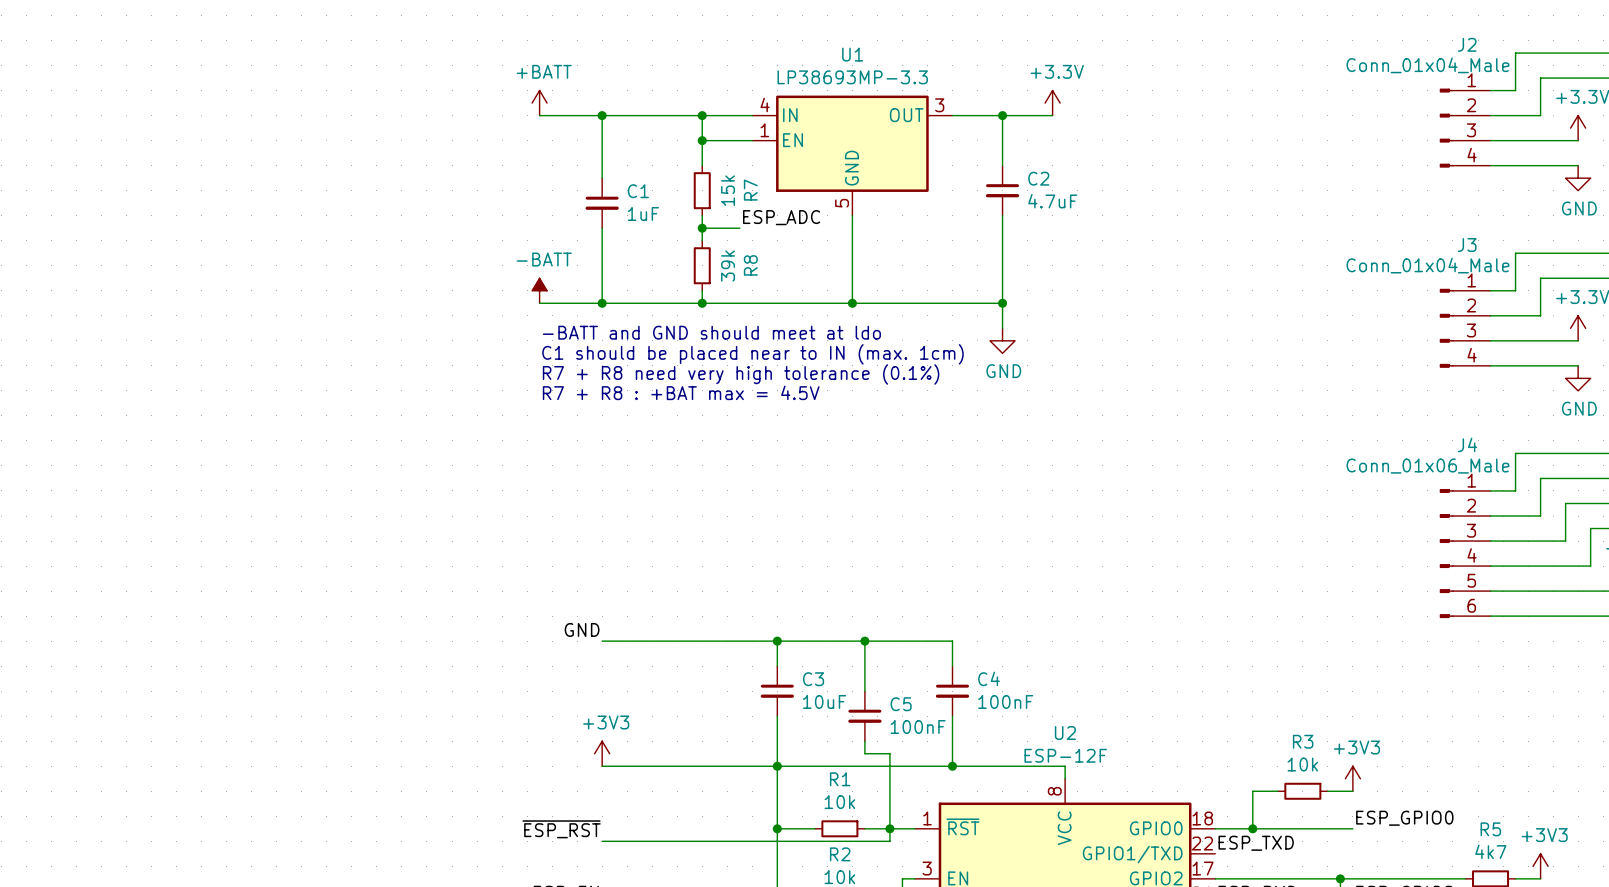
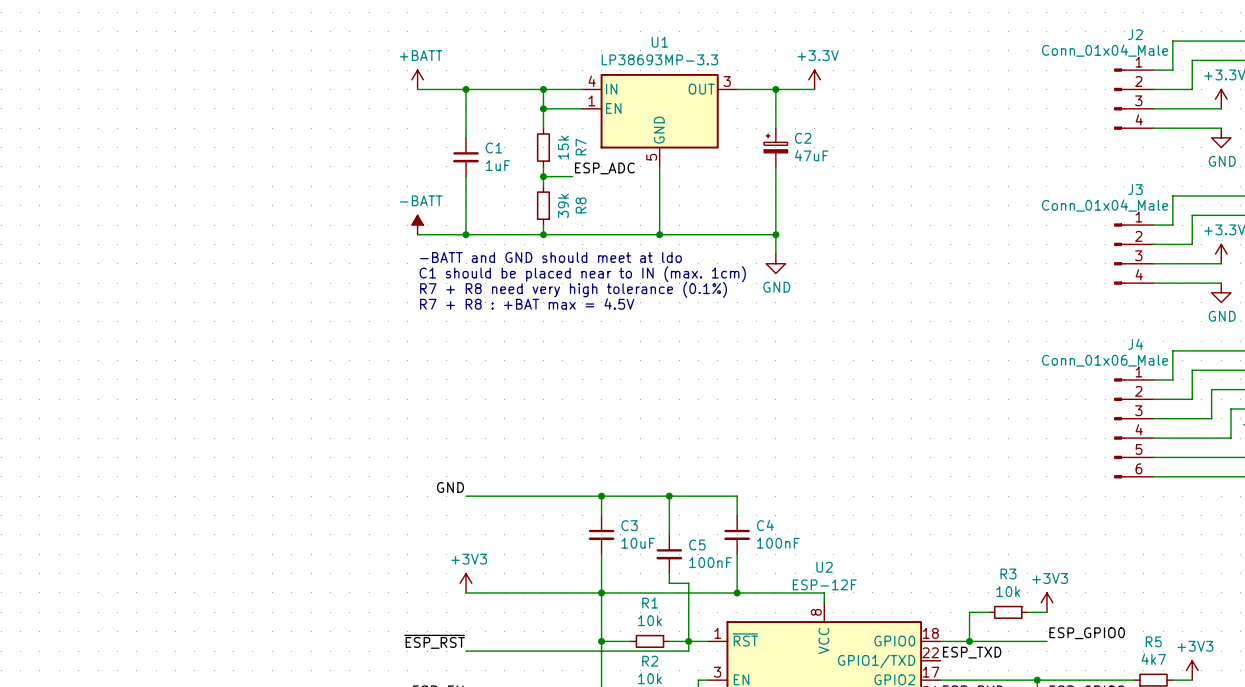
C2 symbol: [985, 165, 1020, 216] -> [764, 128, 788, 167]
C2 value: 4.7uF (1052, 201) -> 47uF (811, 155)

